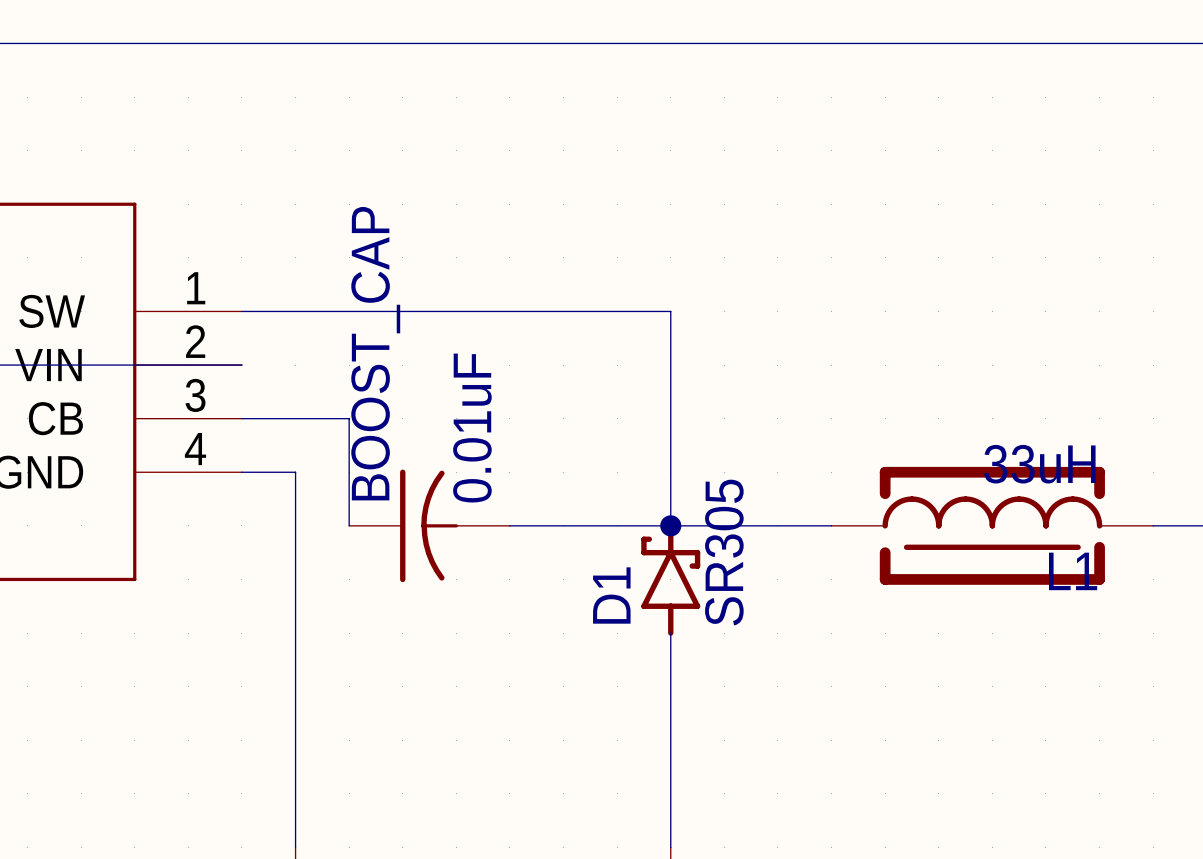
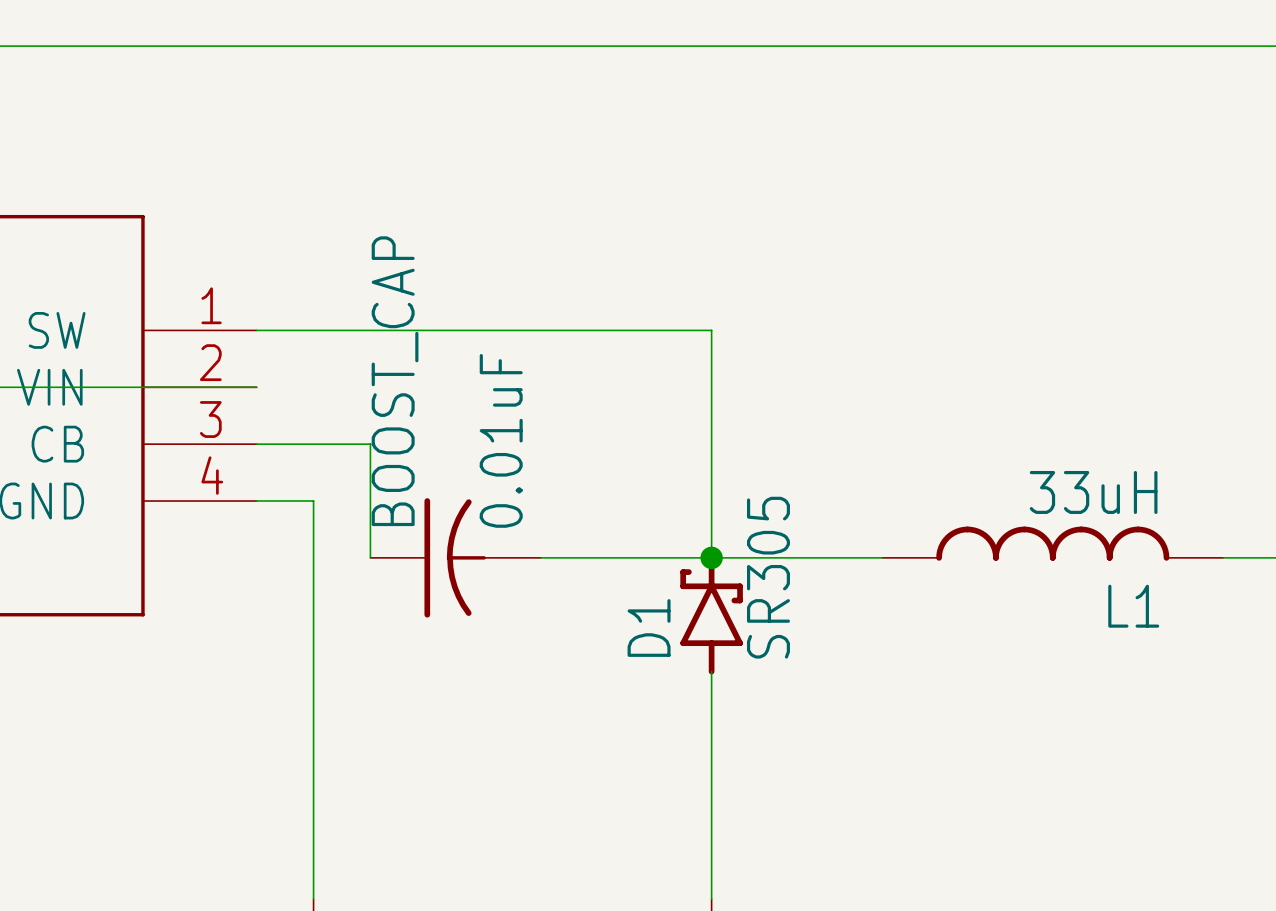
L1 symbol: [831, 466, 1154, 585] -> [882, 526, 1224, 561]

